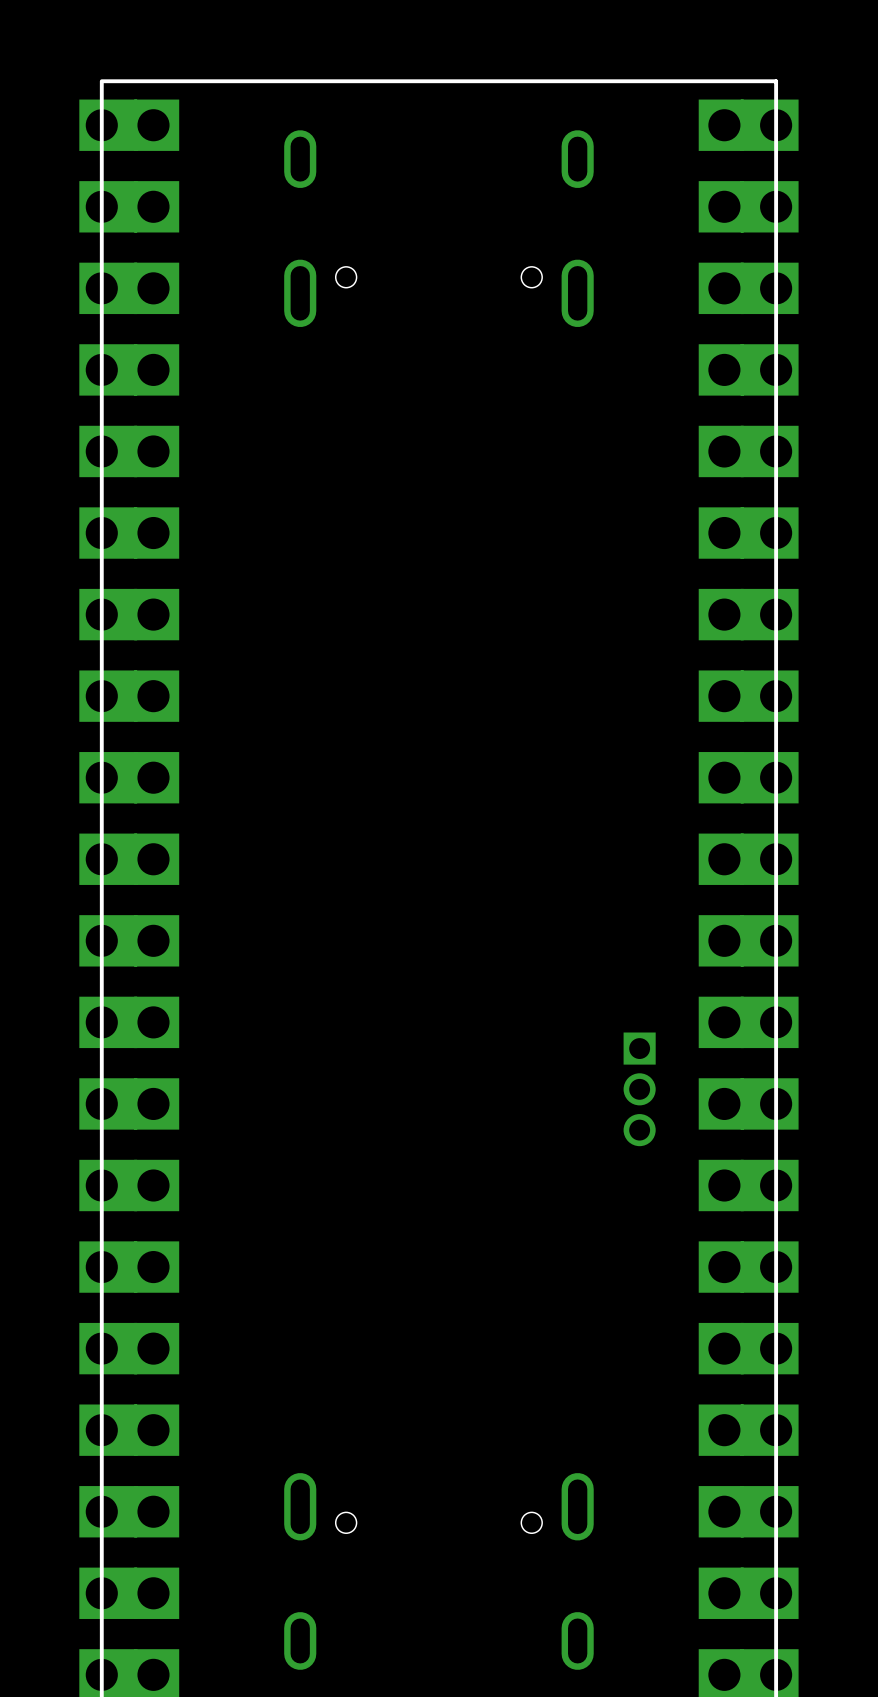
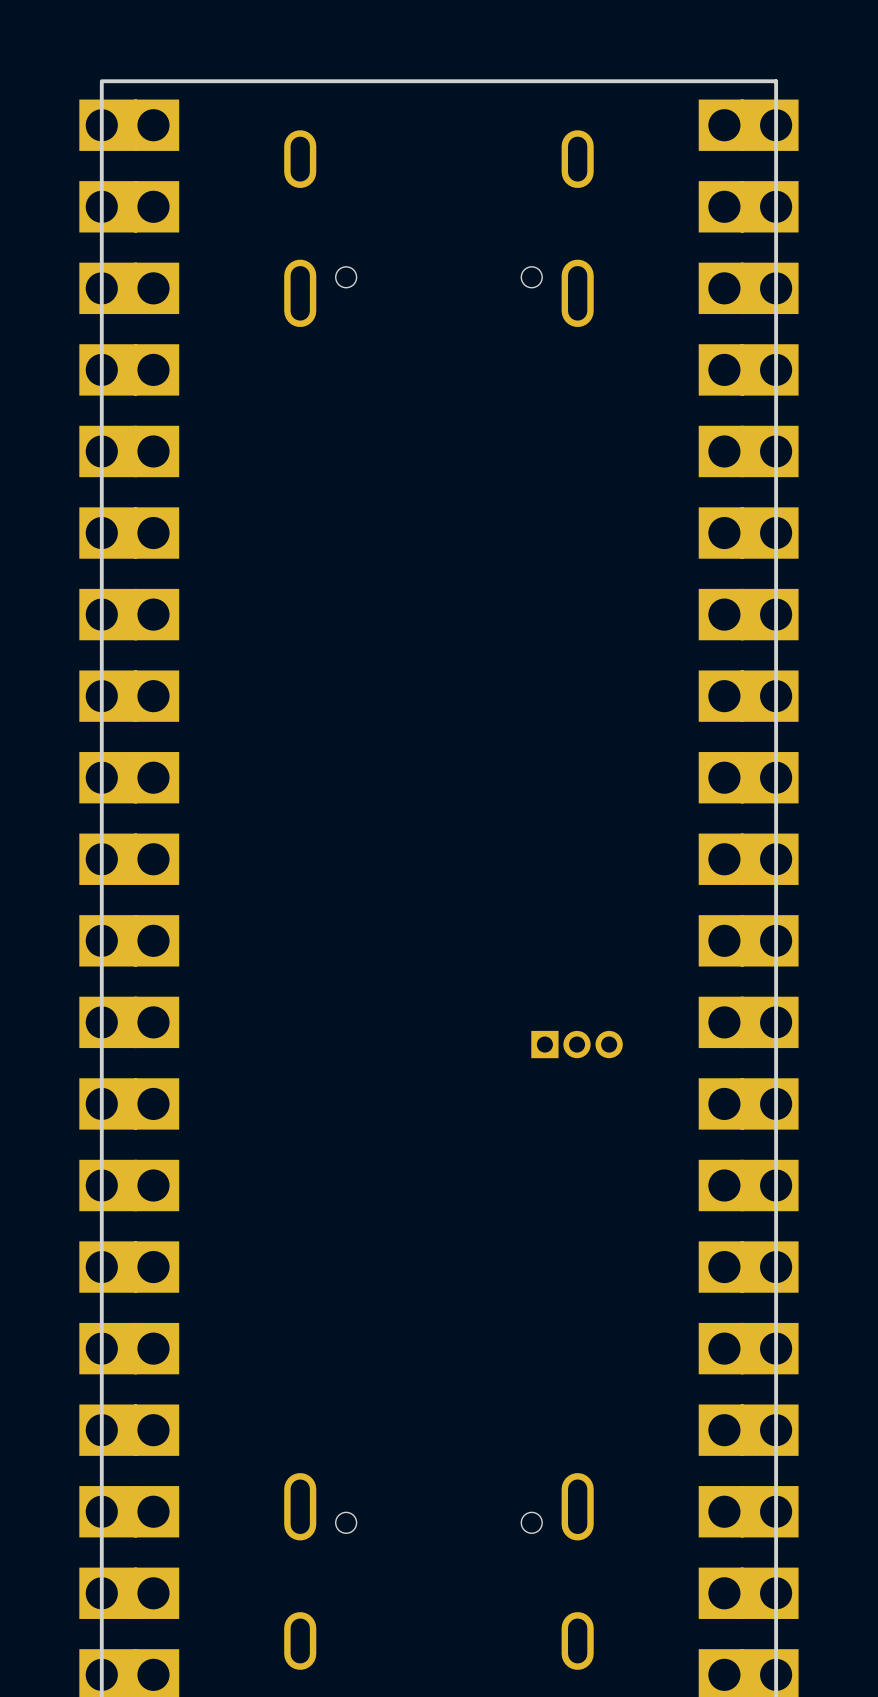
part: none -> (577, 1044)
part: (639, 1089) -> none

